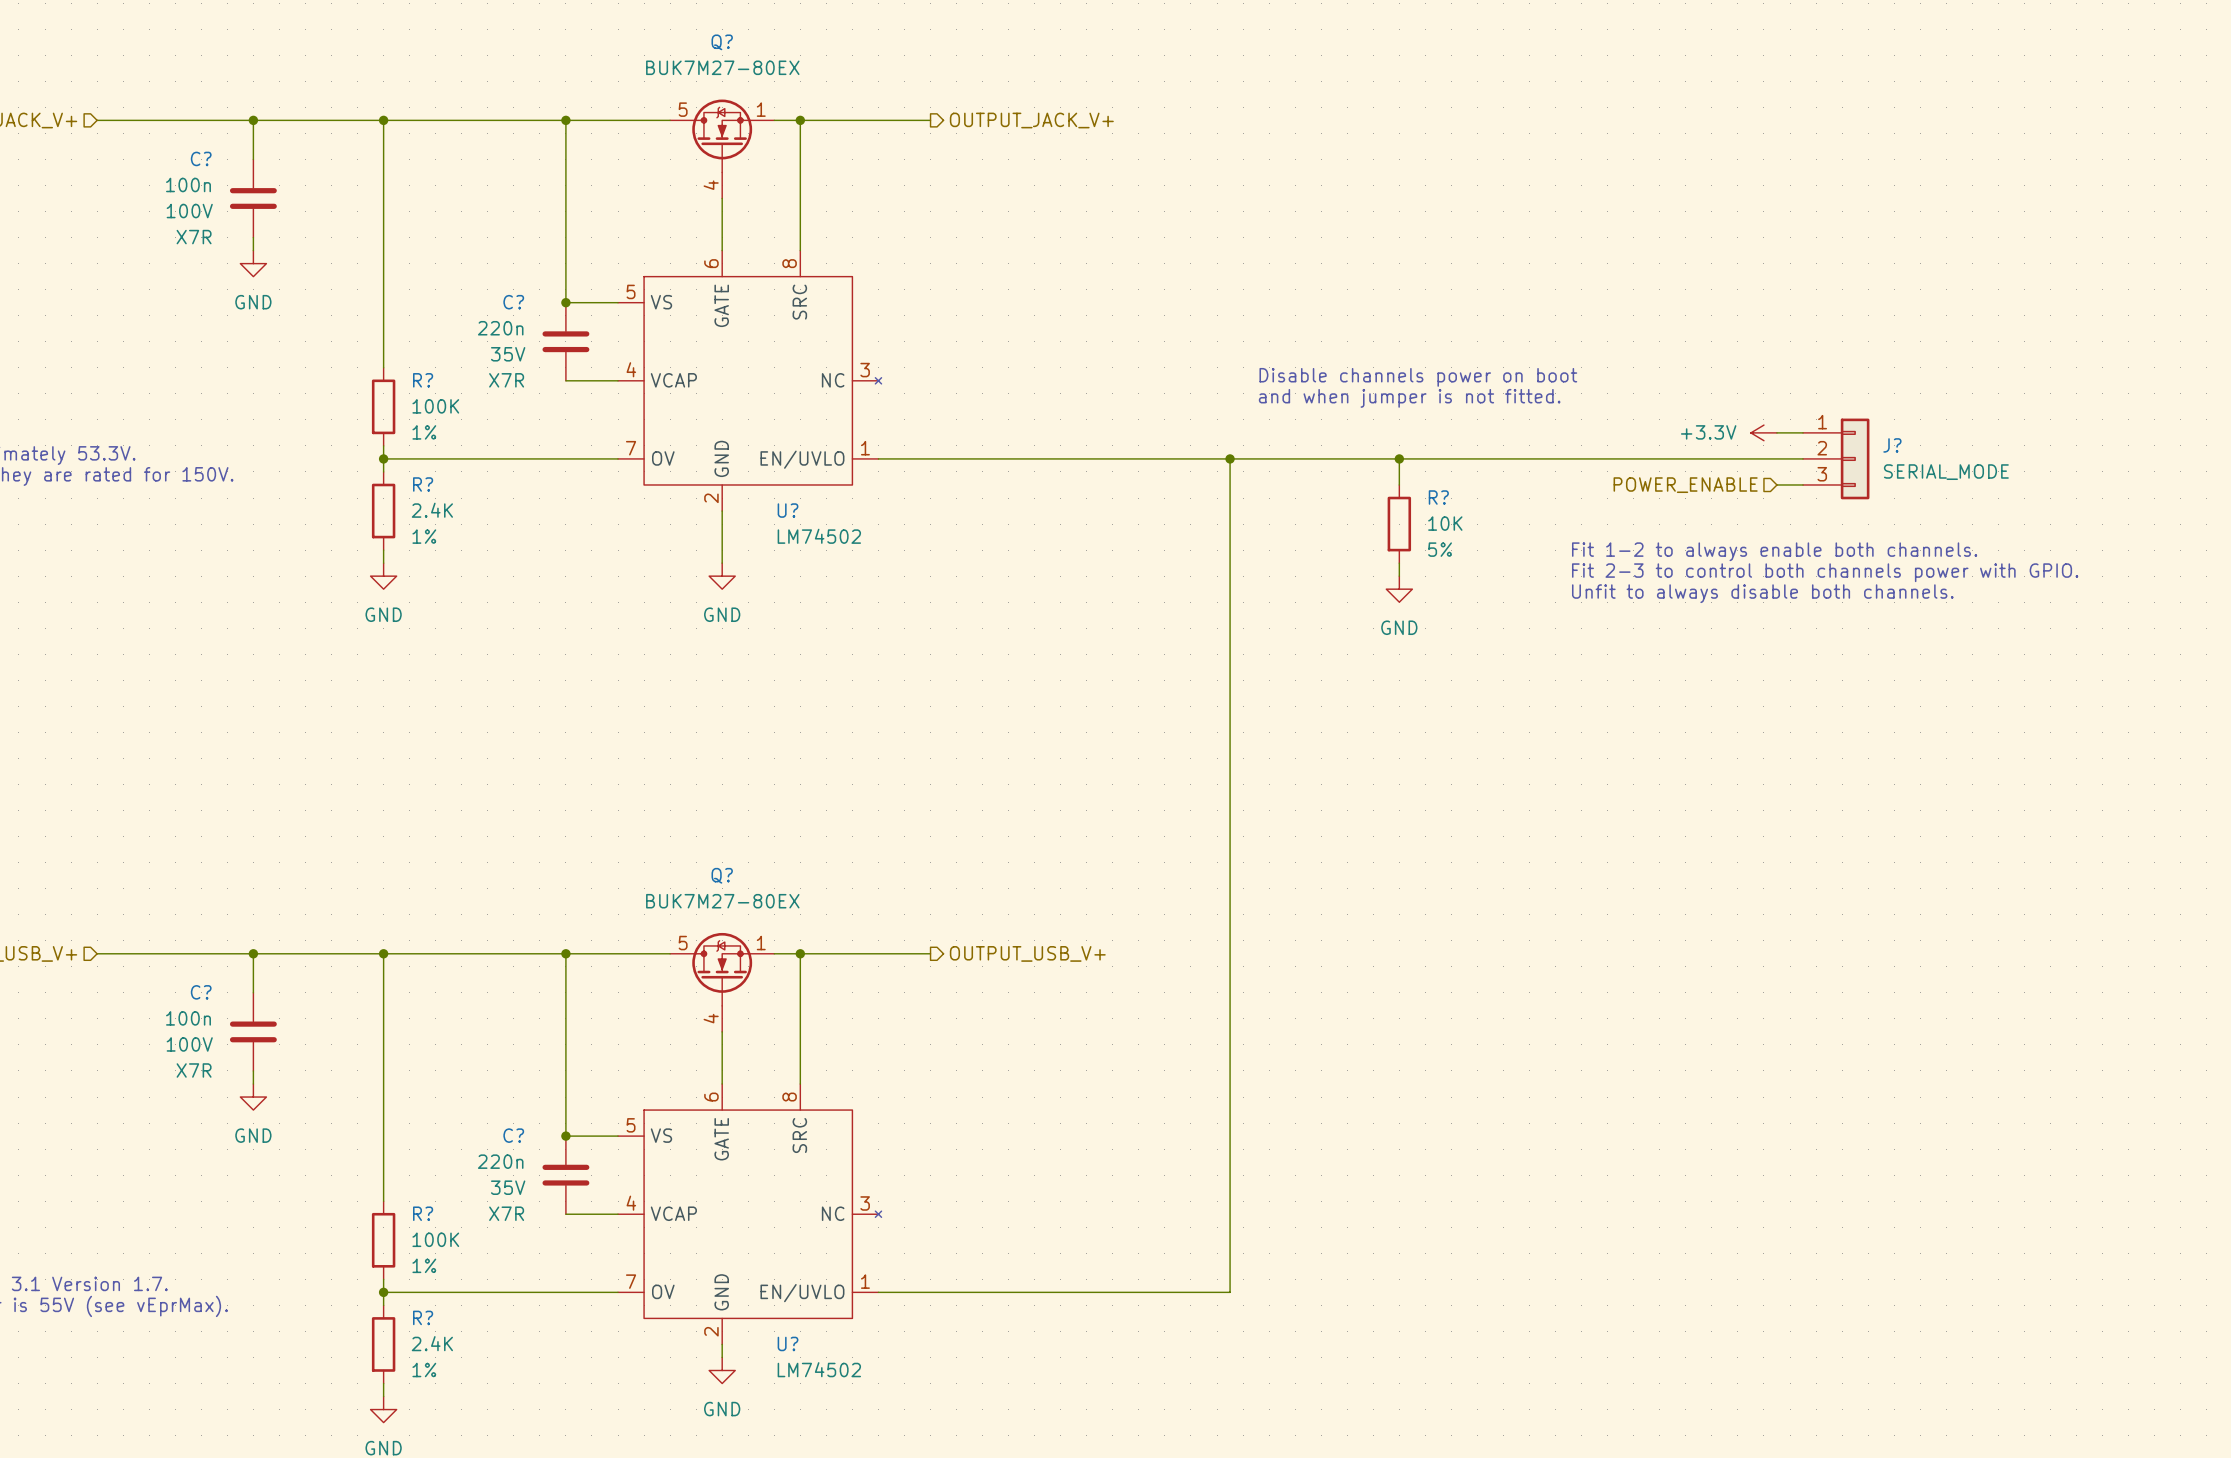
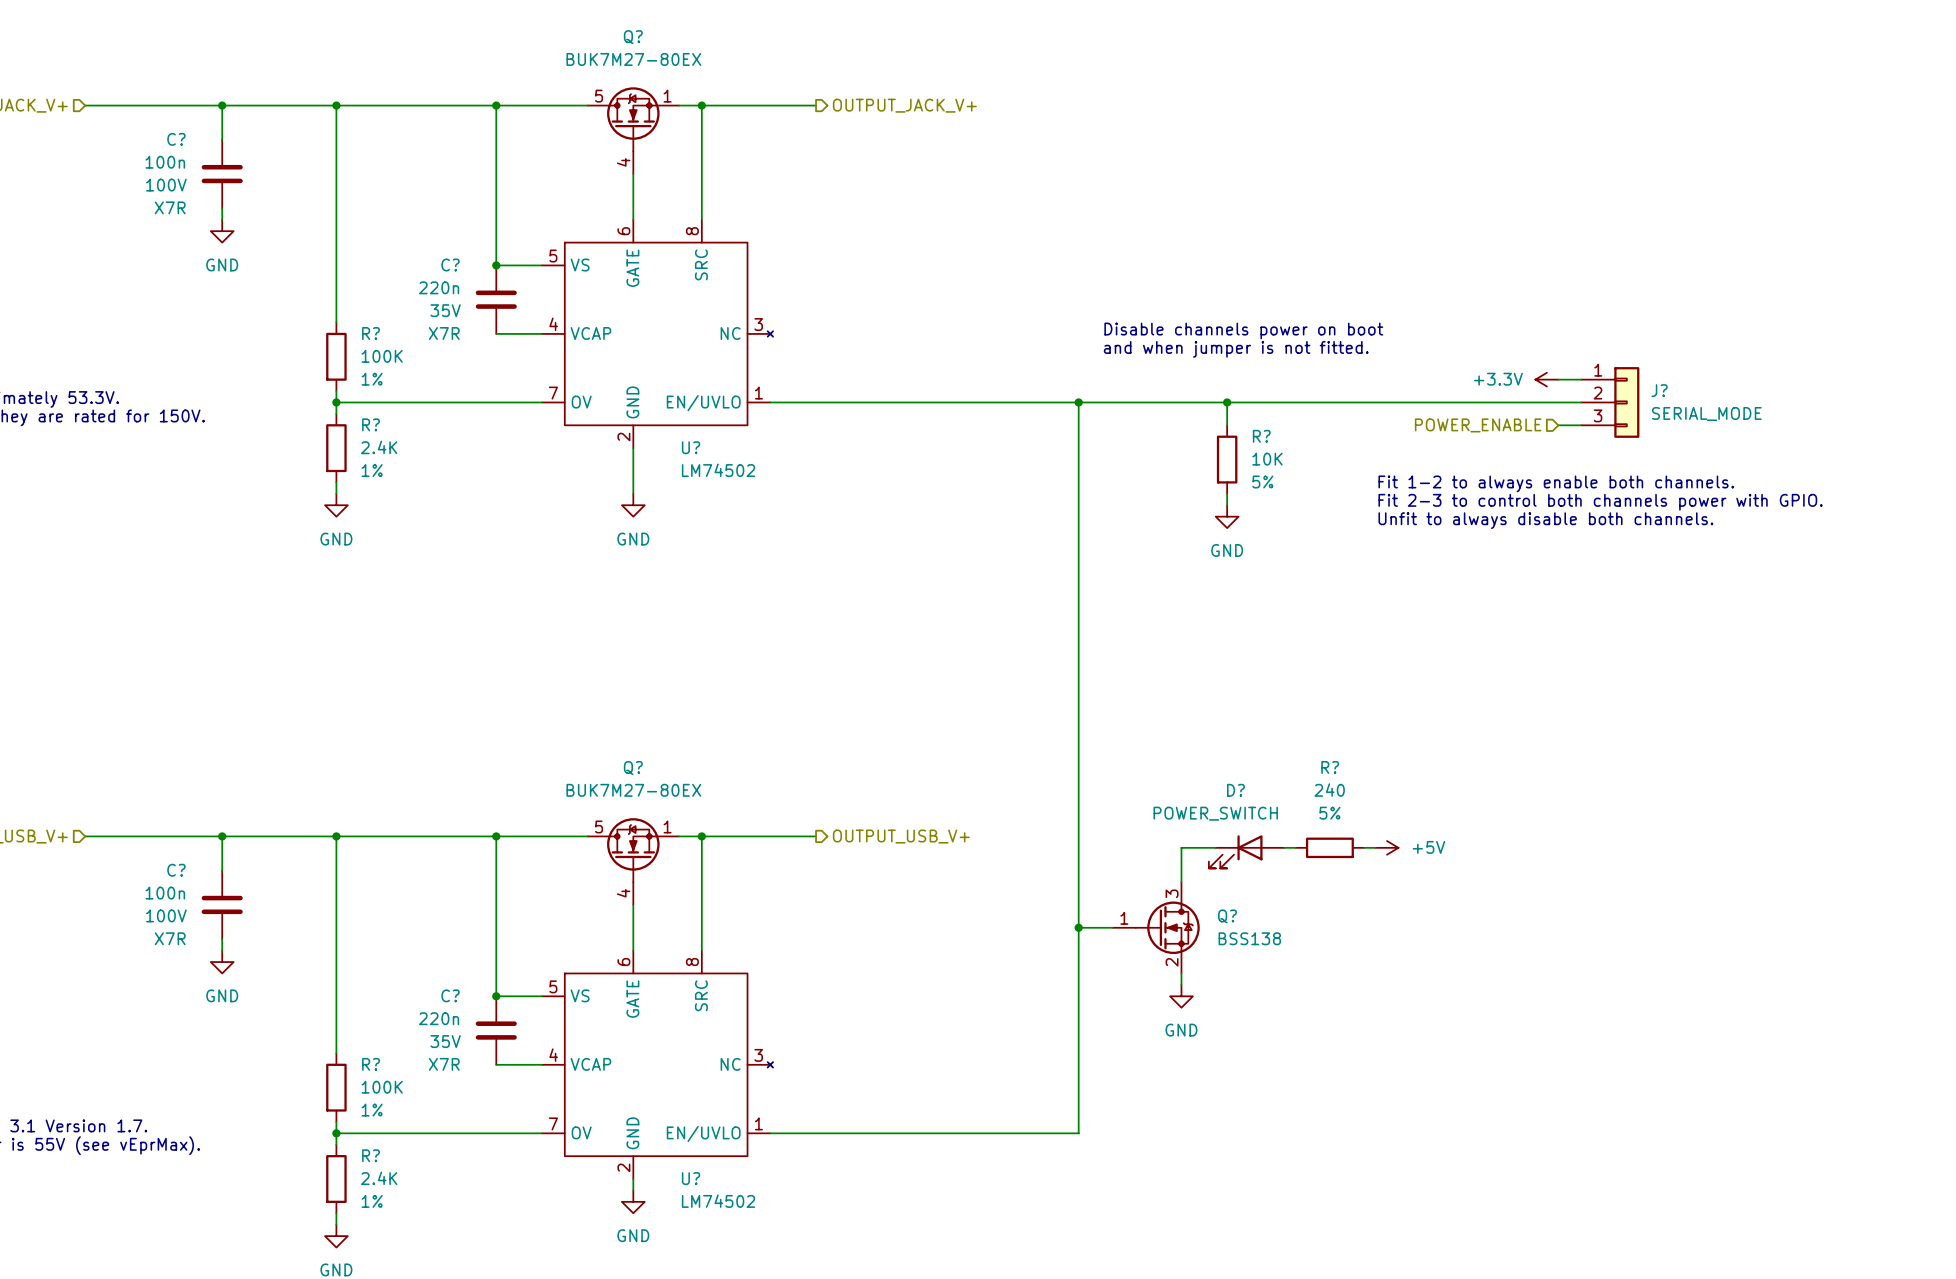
wire: none -> (1215, 847) (1181, 847) (1181, 882)
wire: none -> (1284, 847) (1295, 847)
R?: none -> 240 (1329, 847)
wire: none -> (1364, 847) (1375, 847)
power symbol: none -> +5V (1387, 847)
D?: none -> POWER_SWITCH (1246, 851)
wire: none -> (1078, 927) (1112, 927)
junction: none -> (1078, 927)
Q?: none -> BSS138 (1156, 927)
wire: none -> (1181, 973) (1181, 984)
power symbol: none -> GND (1181, 996)

